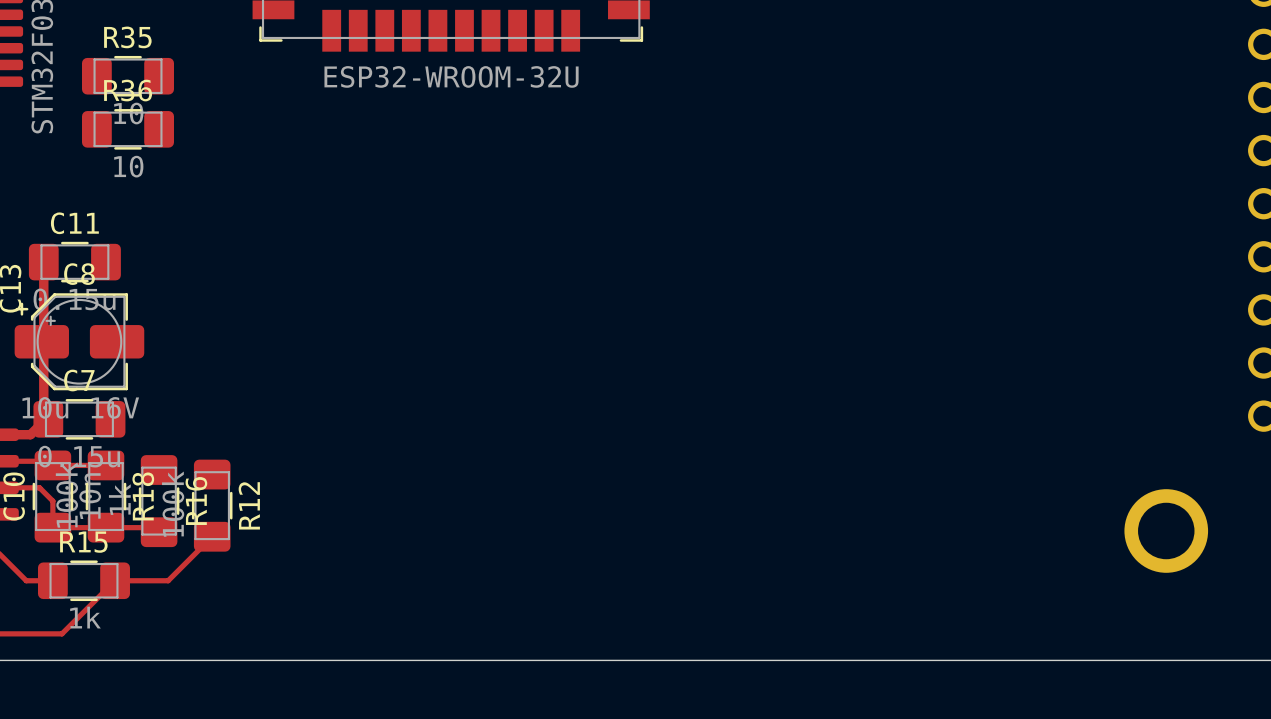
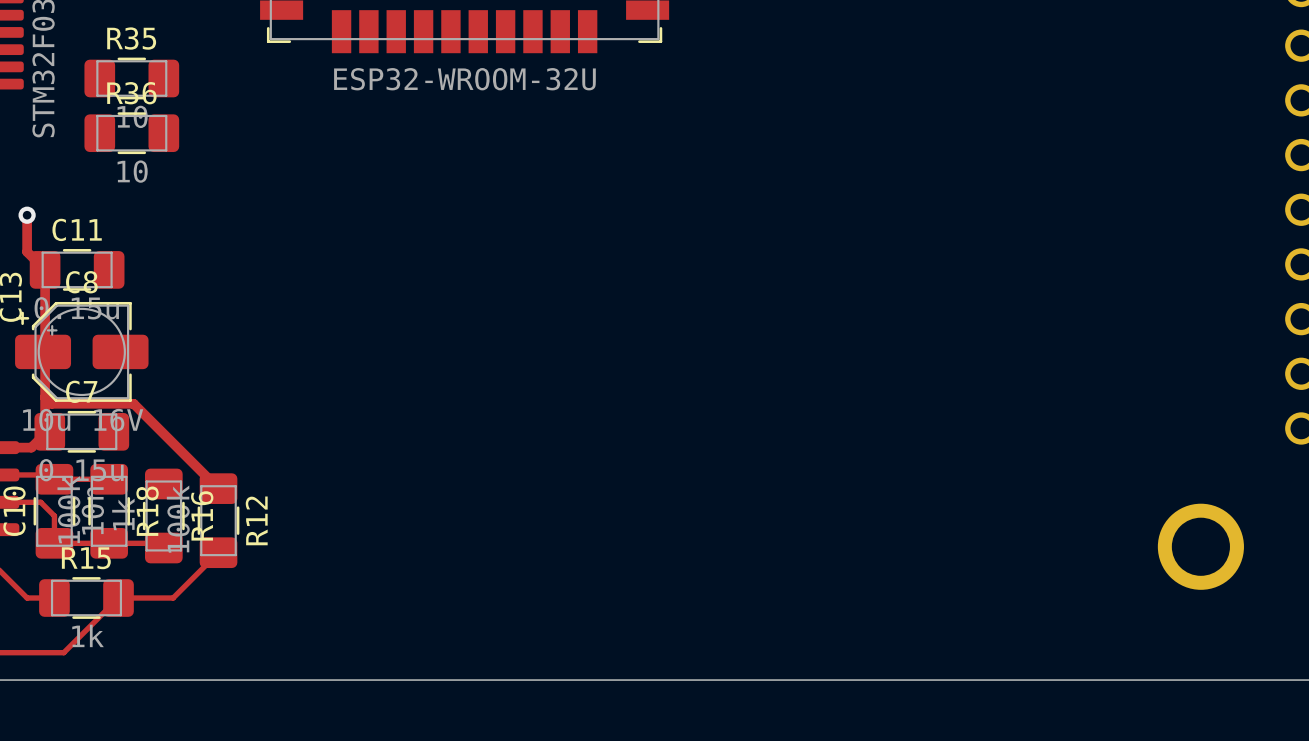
track: none -> (27, 215) (27, 251) (45, 269)
via: none -> (27, 215)
track: none -> (45, 397) (51, 403) (133, 403) (218, 488)

